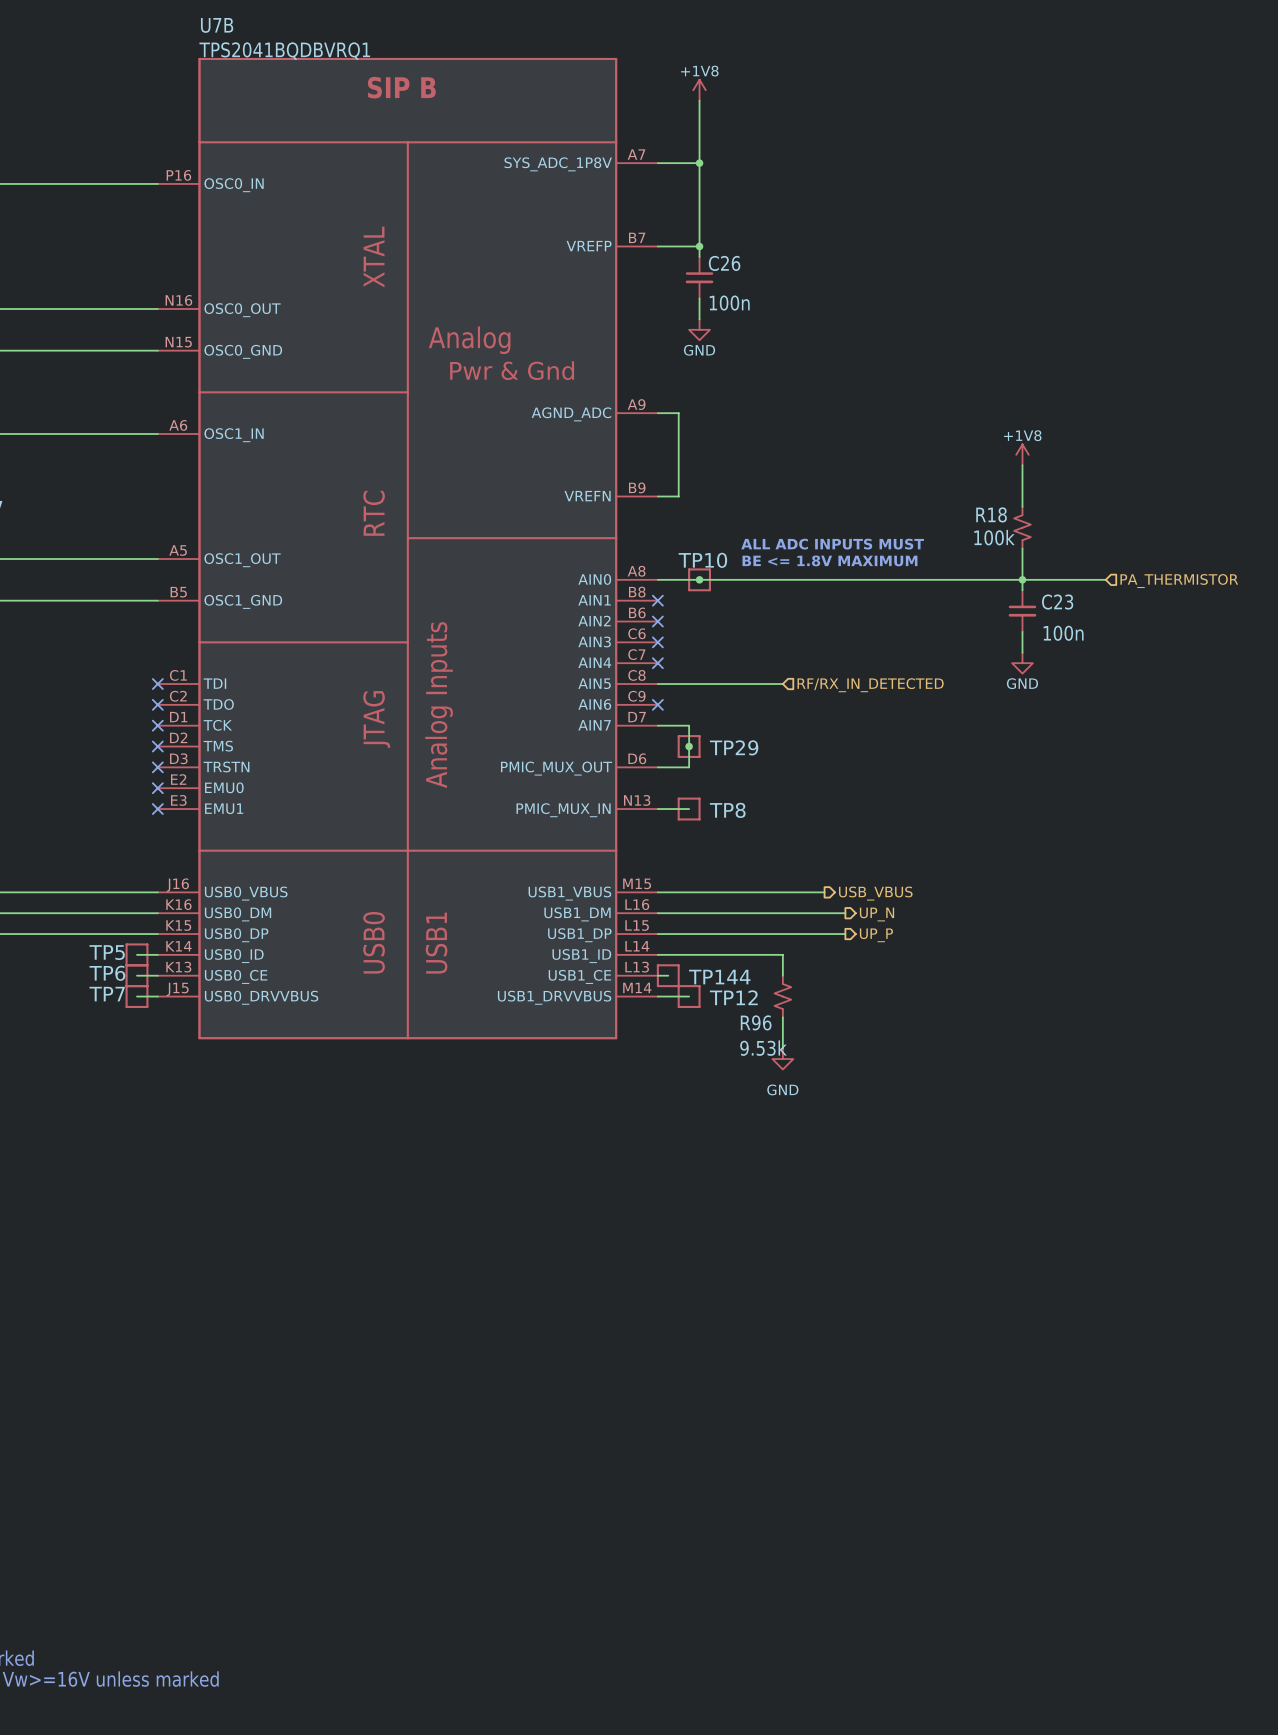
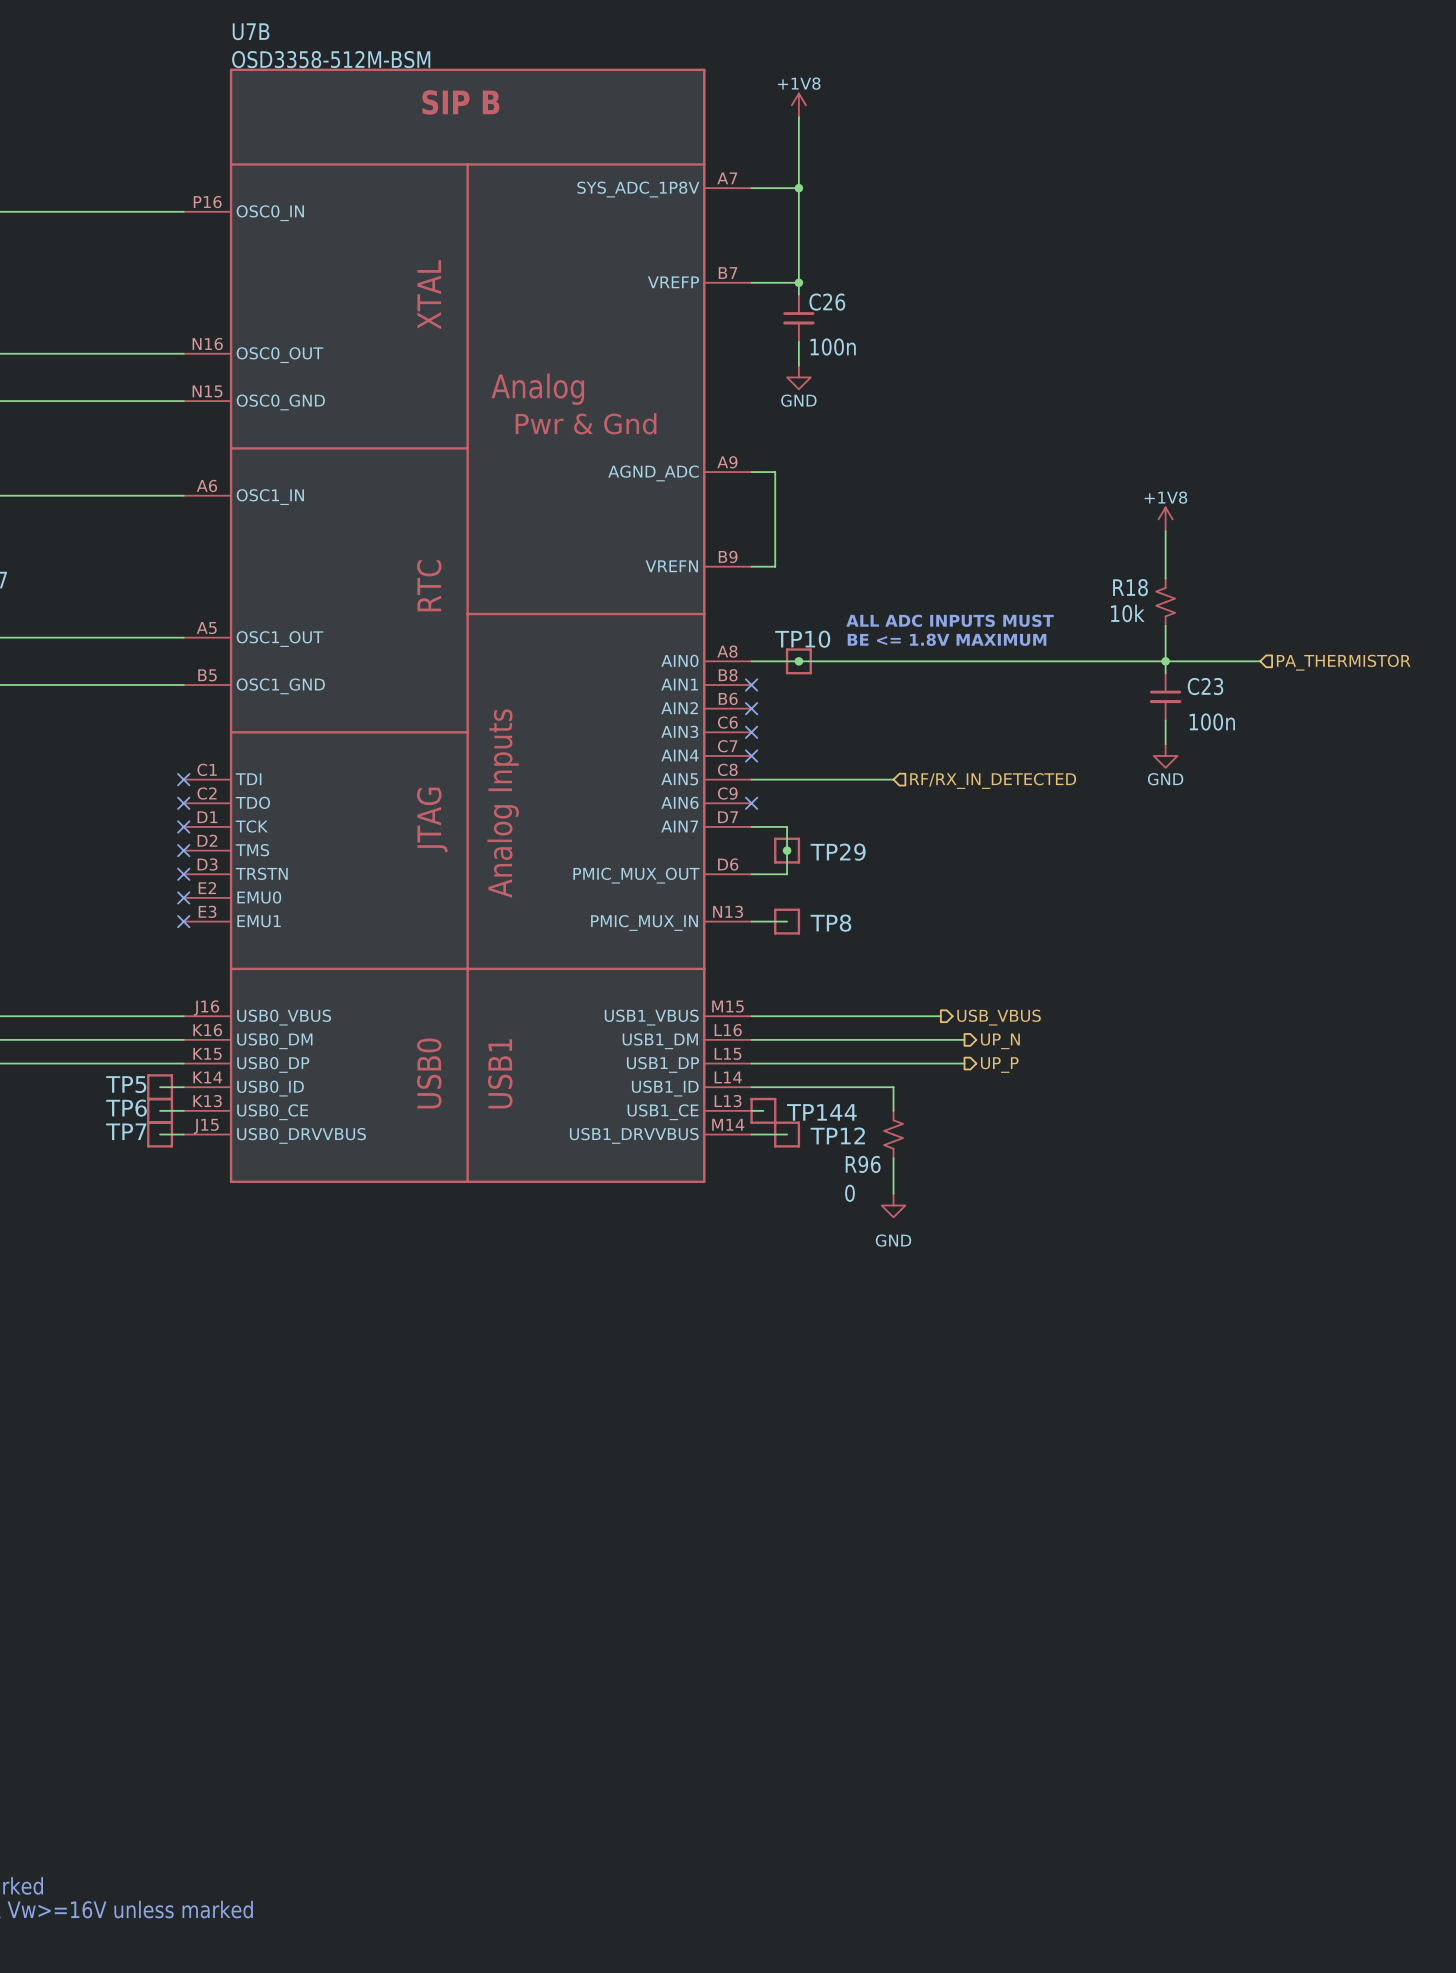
U7B value: TPS2041BQDBVRQ1 (284, 51) -> OSD3358-512M-BSM (331, 59)
R18 value: 100k (994, 537) -> 10k (1127, 613)
R96 value: 9.53k (763, 1048) -> 0 (849, 1193)

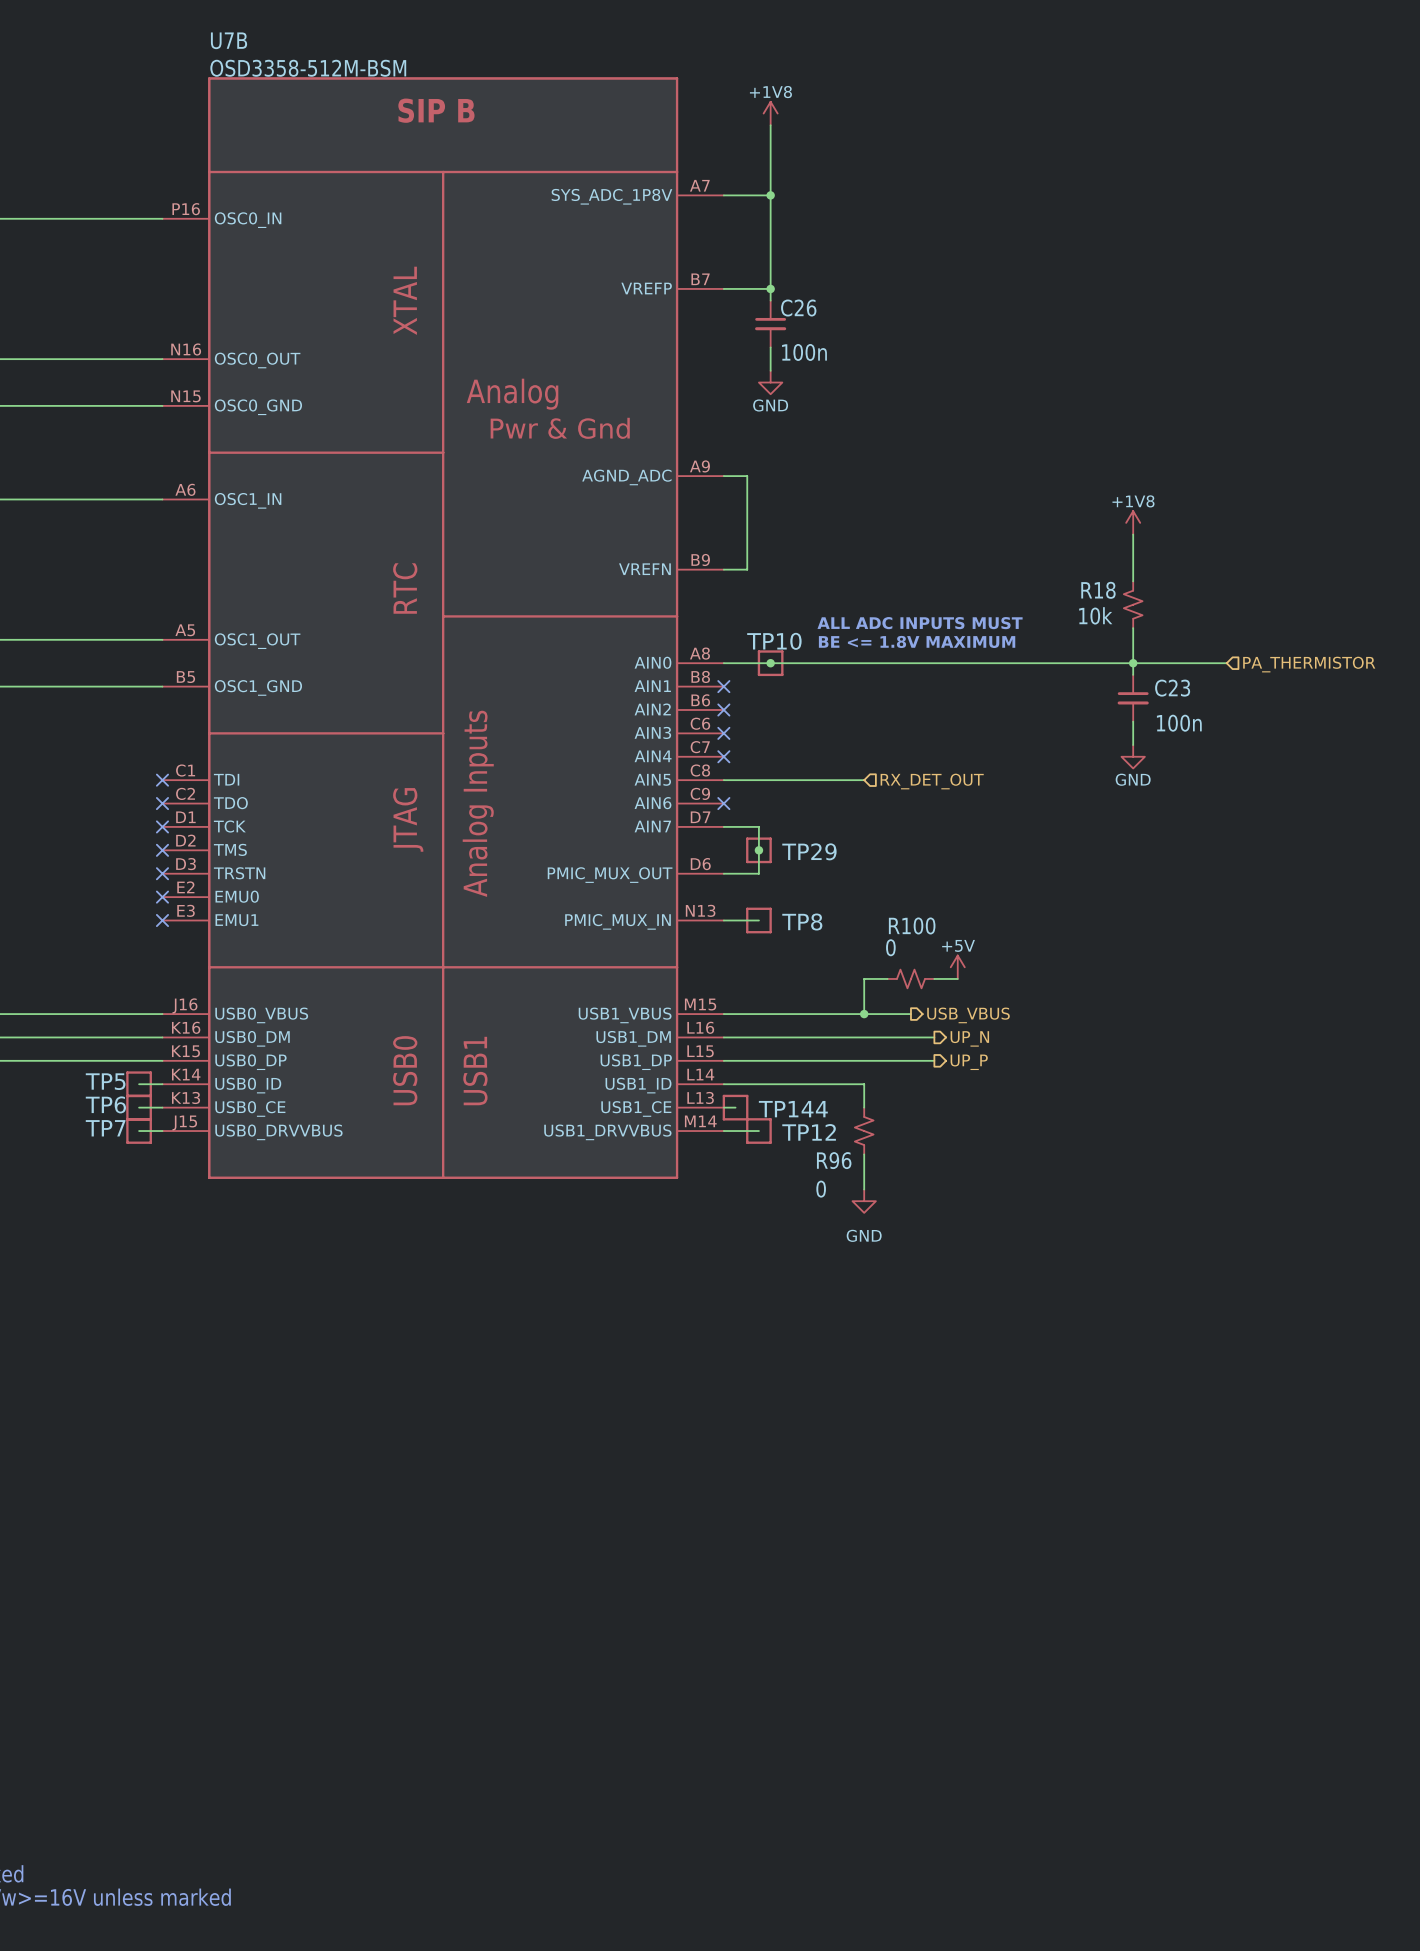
hierarchical label: RF/RX_IN_DETECTED (993, 781) -> RX_DET_OUT (932, 781)
power symbol: none -> +5V (957, 967)
wire: none -> (887, 978) (864, 978) (864, 1014)
R100: none -> 0 (910, 978)
wire: none -> (934, 978) (957, 978)
junction: none -> (864, 1014)

